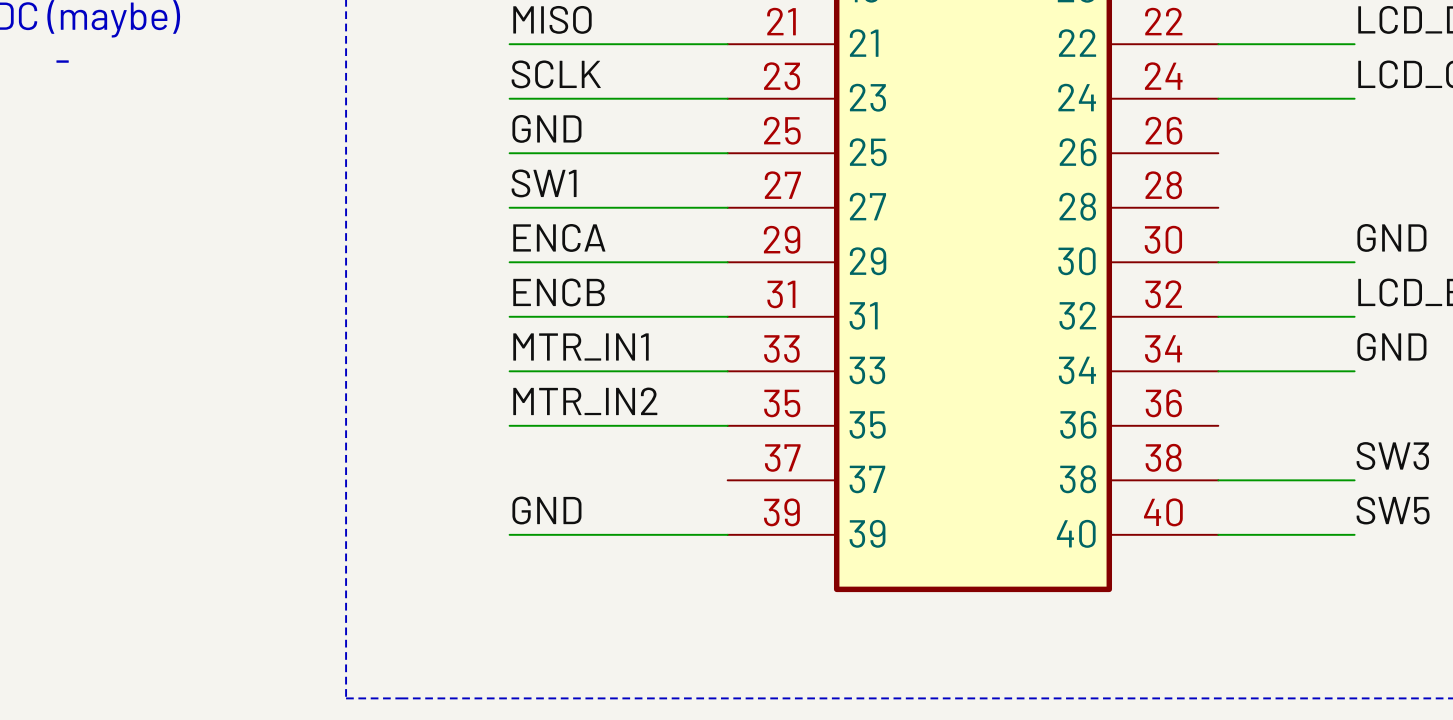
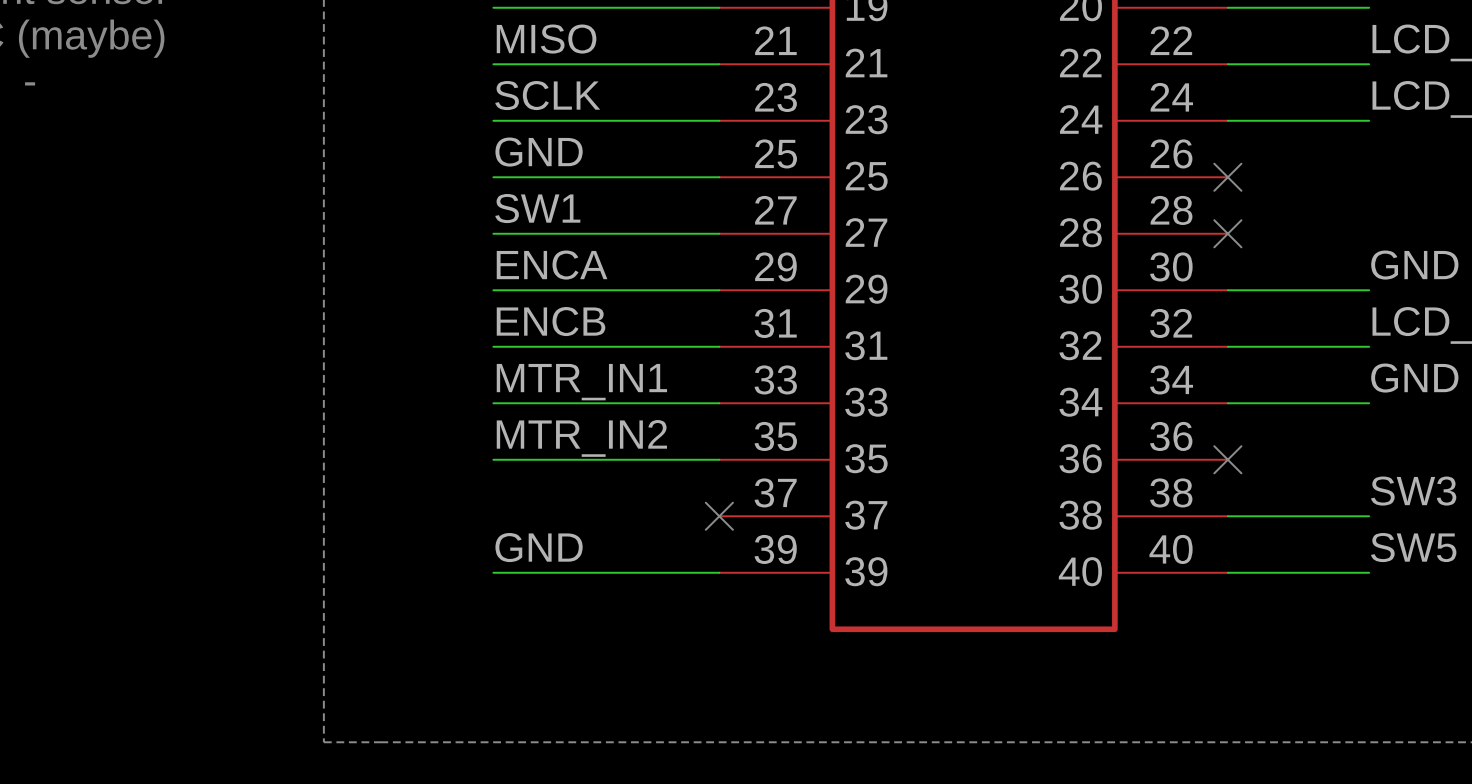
no-connect mark: none -> (1227, 177)
no-connect mark: none -> (1227, 233)
no-connect mark: none -> (1227, 459)
no-connect mark: none -> (719, 516)

